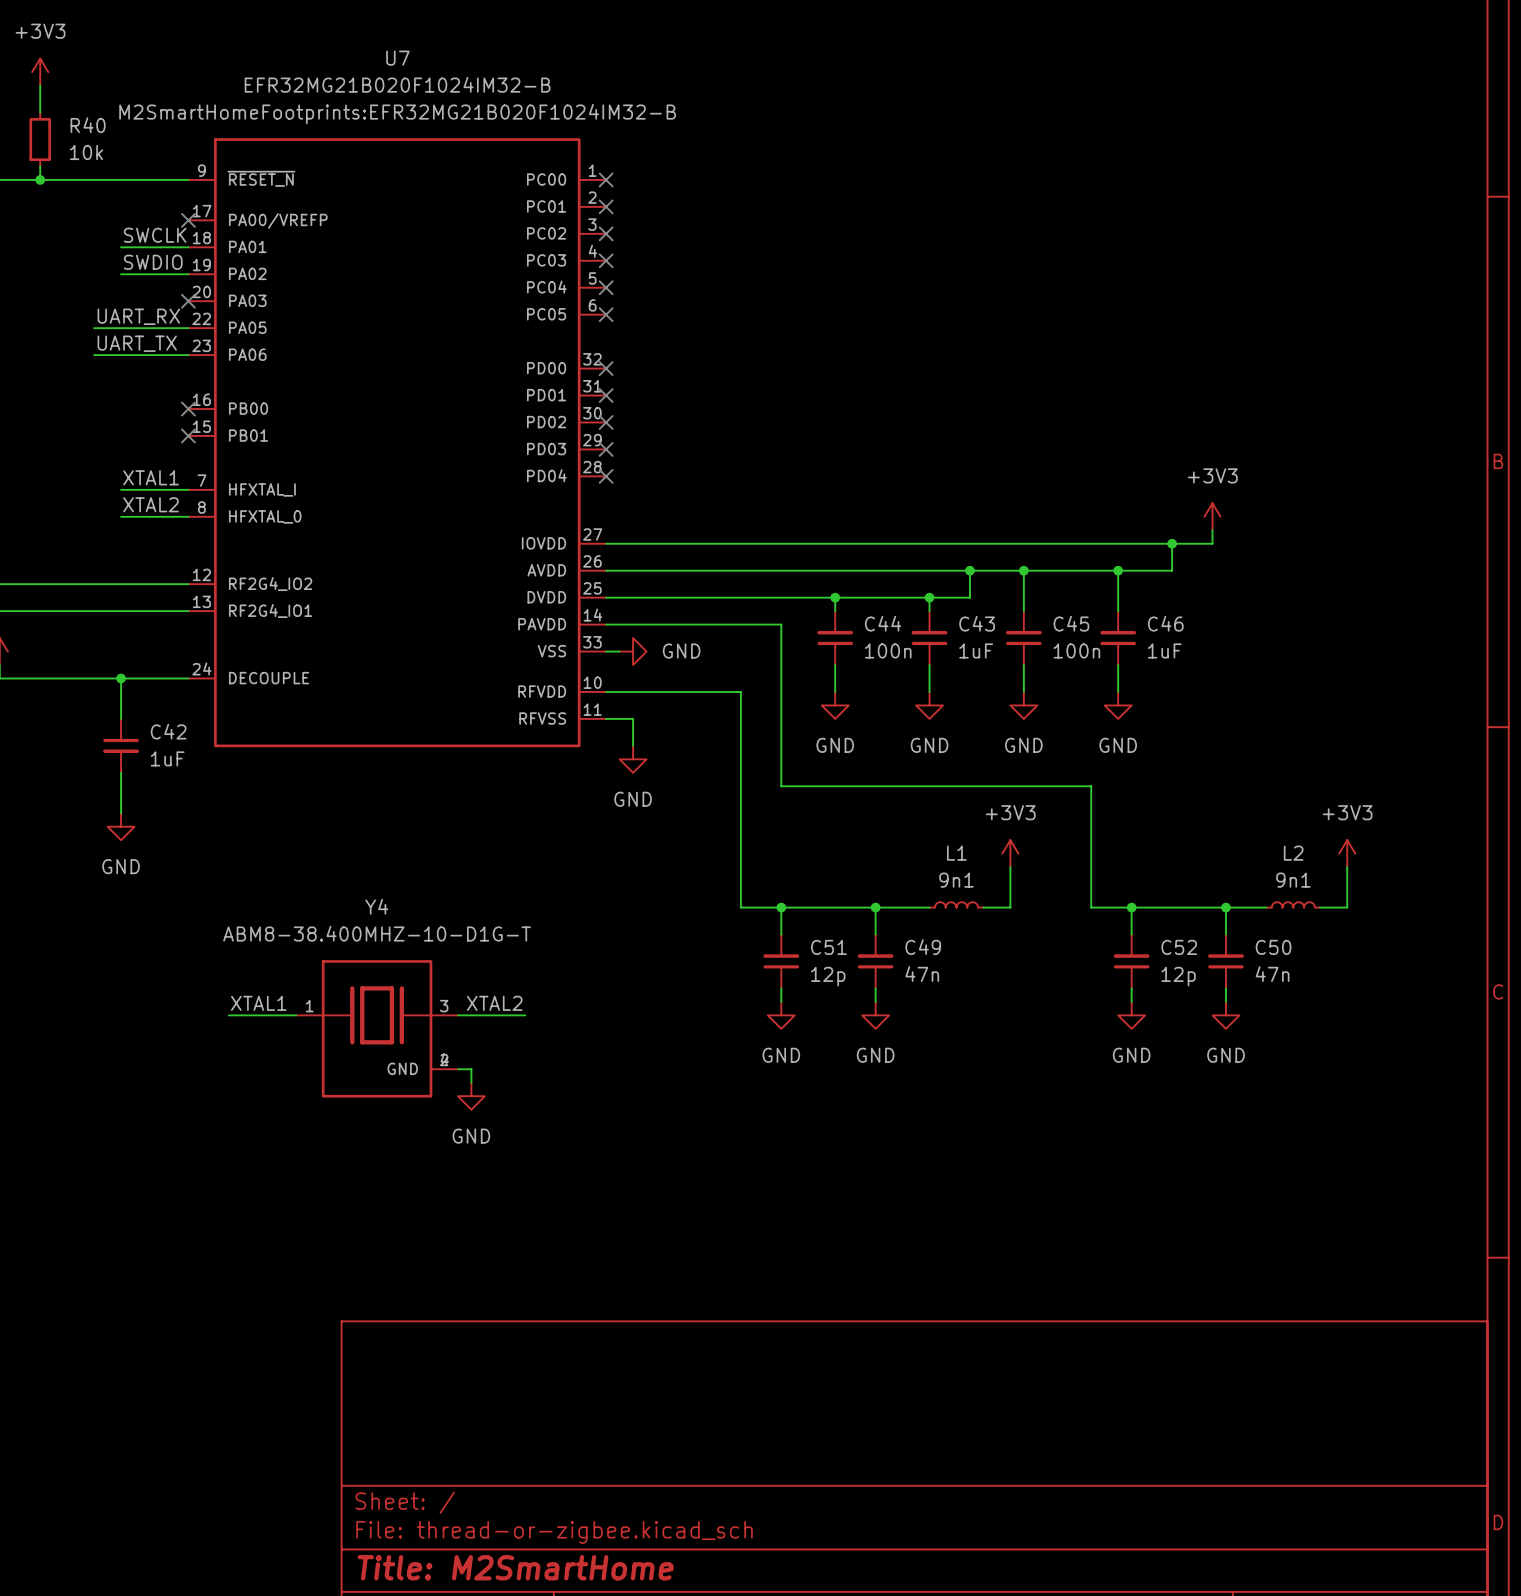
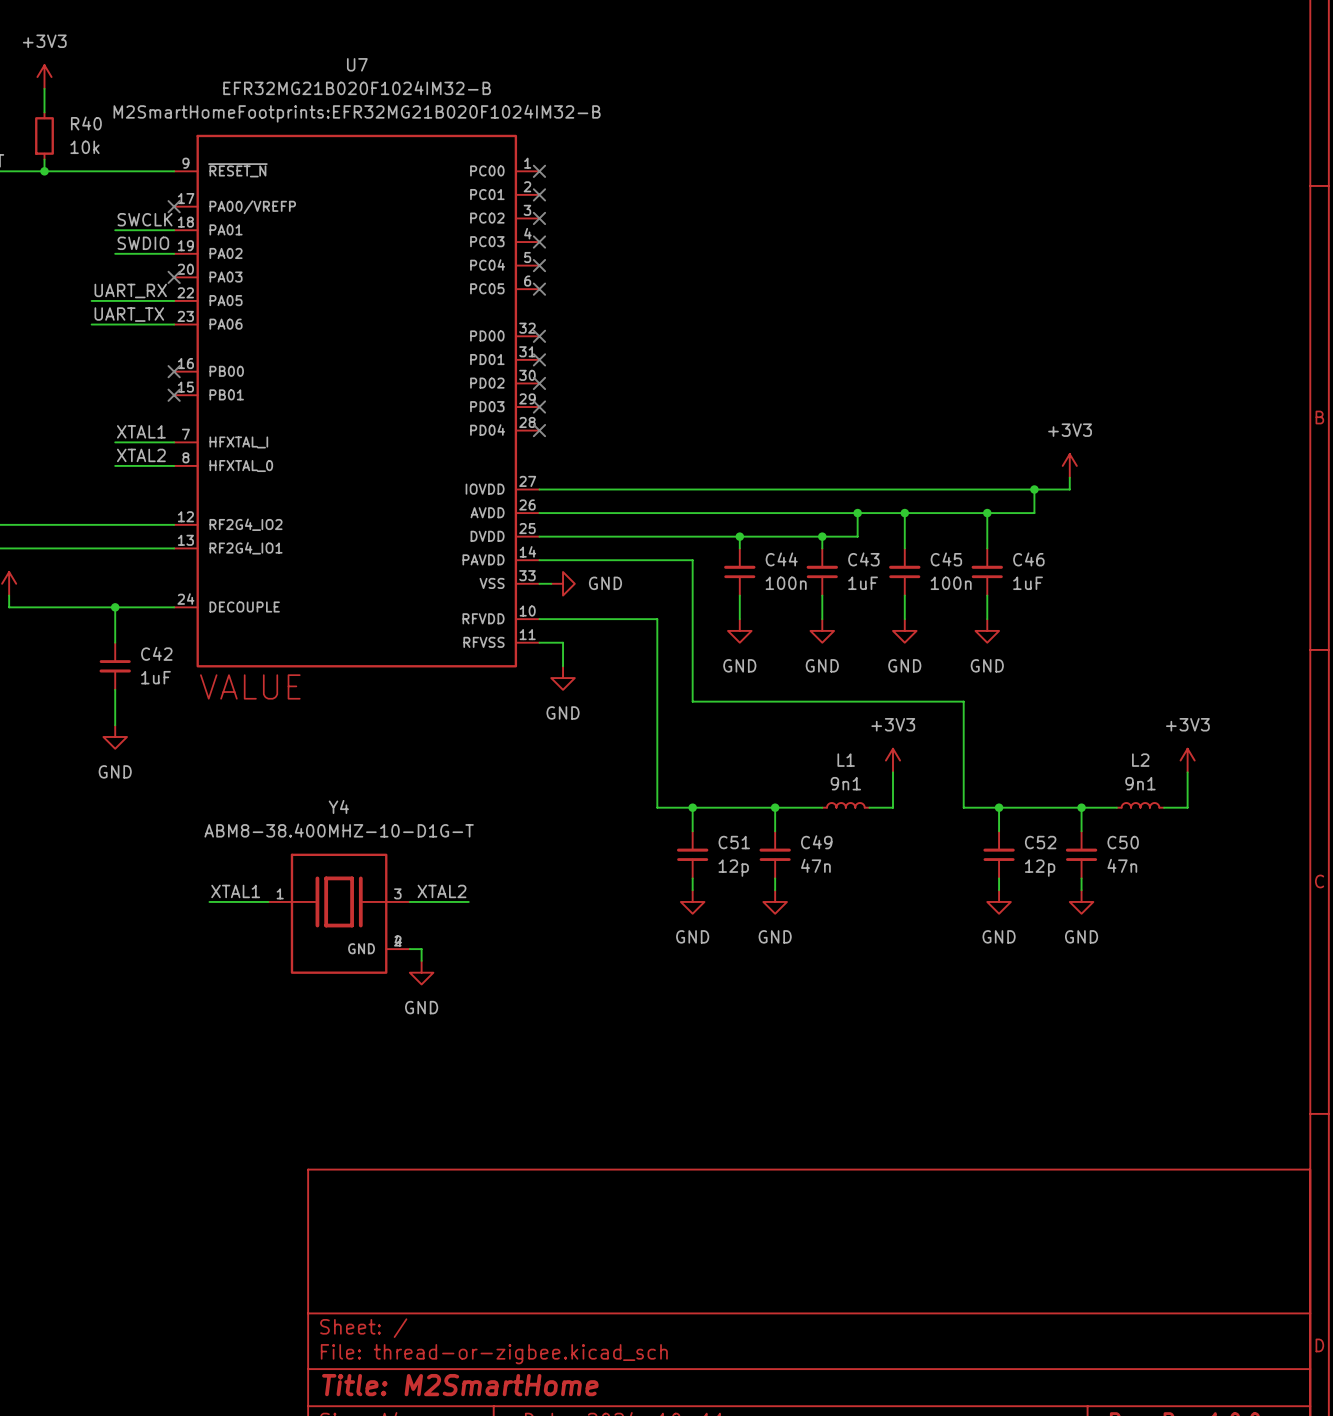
U7 text: none -> VALUE (250, 686)

